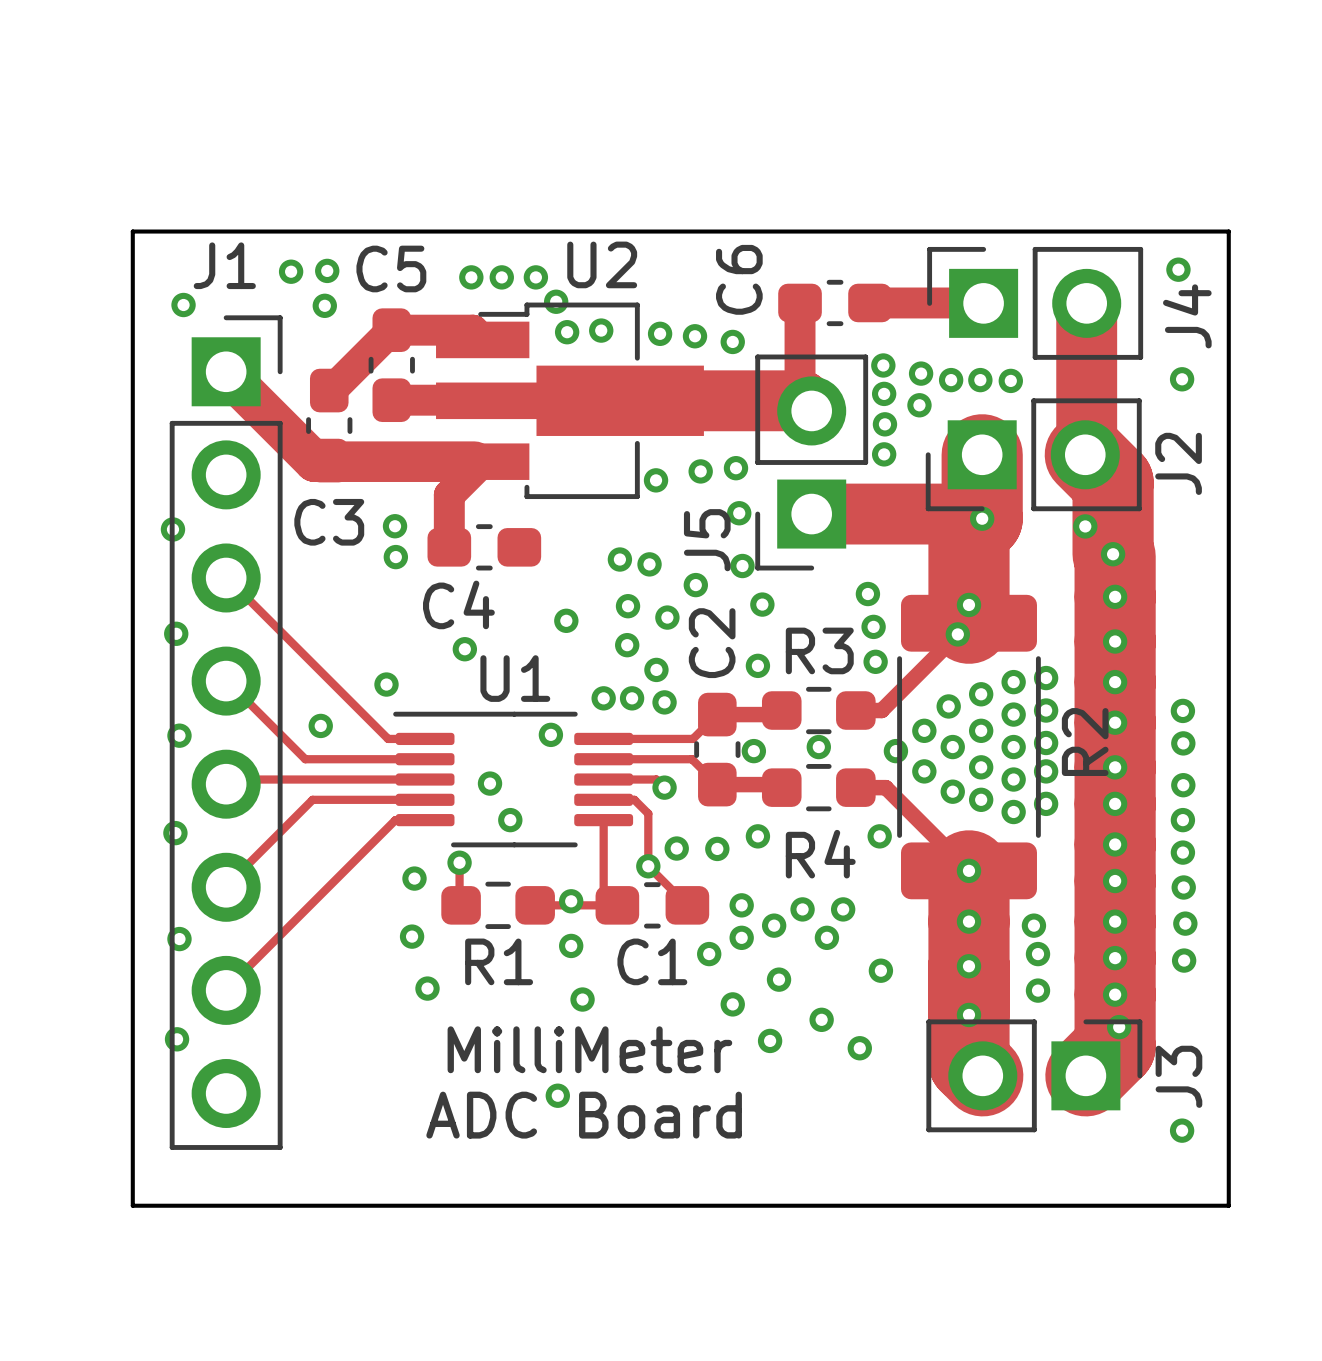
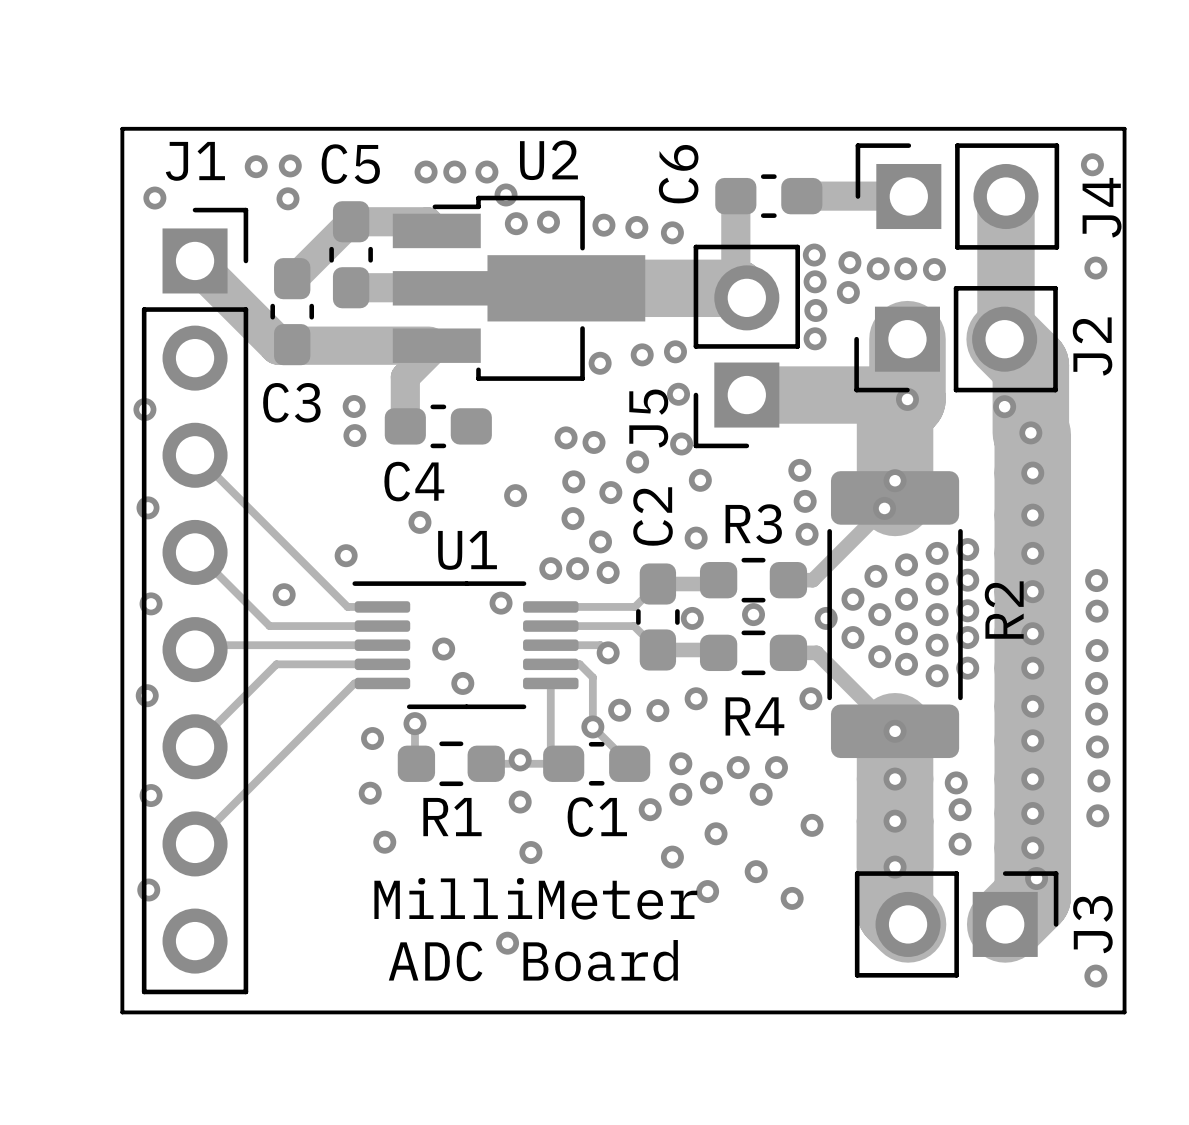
board edge: (149, 231) (132, 231) (132, 1205) (1228, 1205) (1228, 231) (1212, 231) -> (122, 128) (122, 1012) (1124, 1012) (1124, 128)

